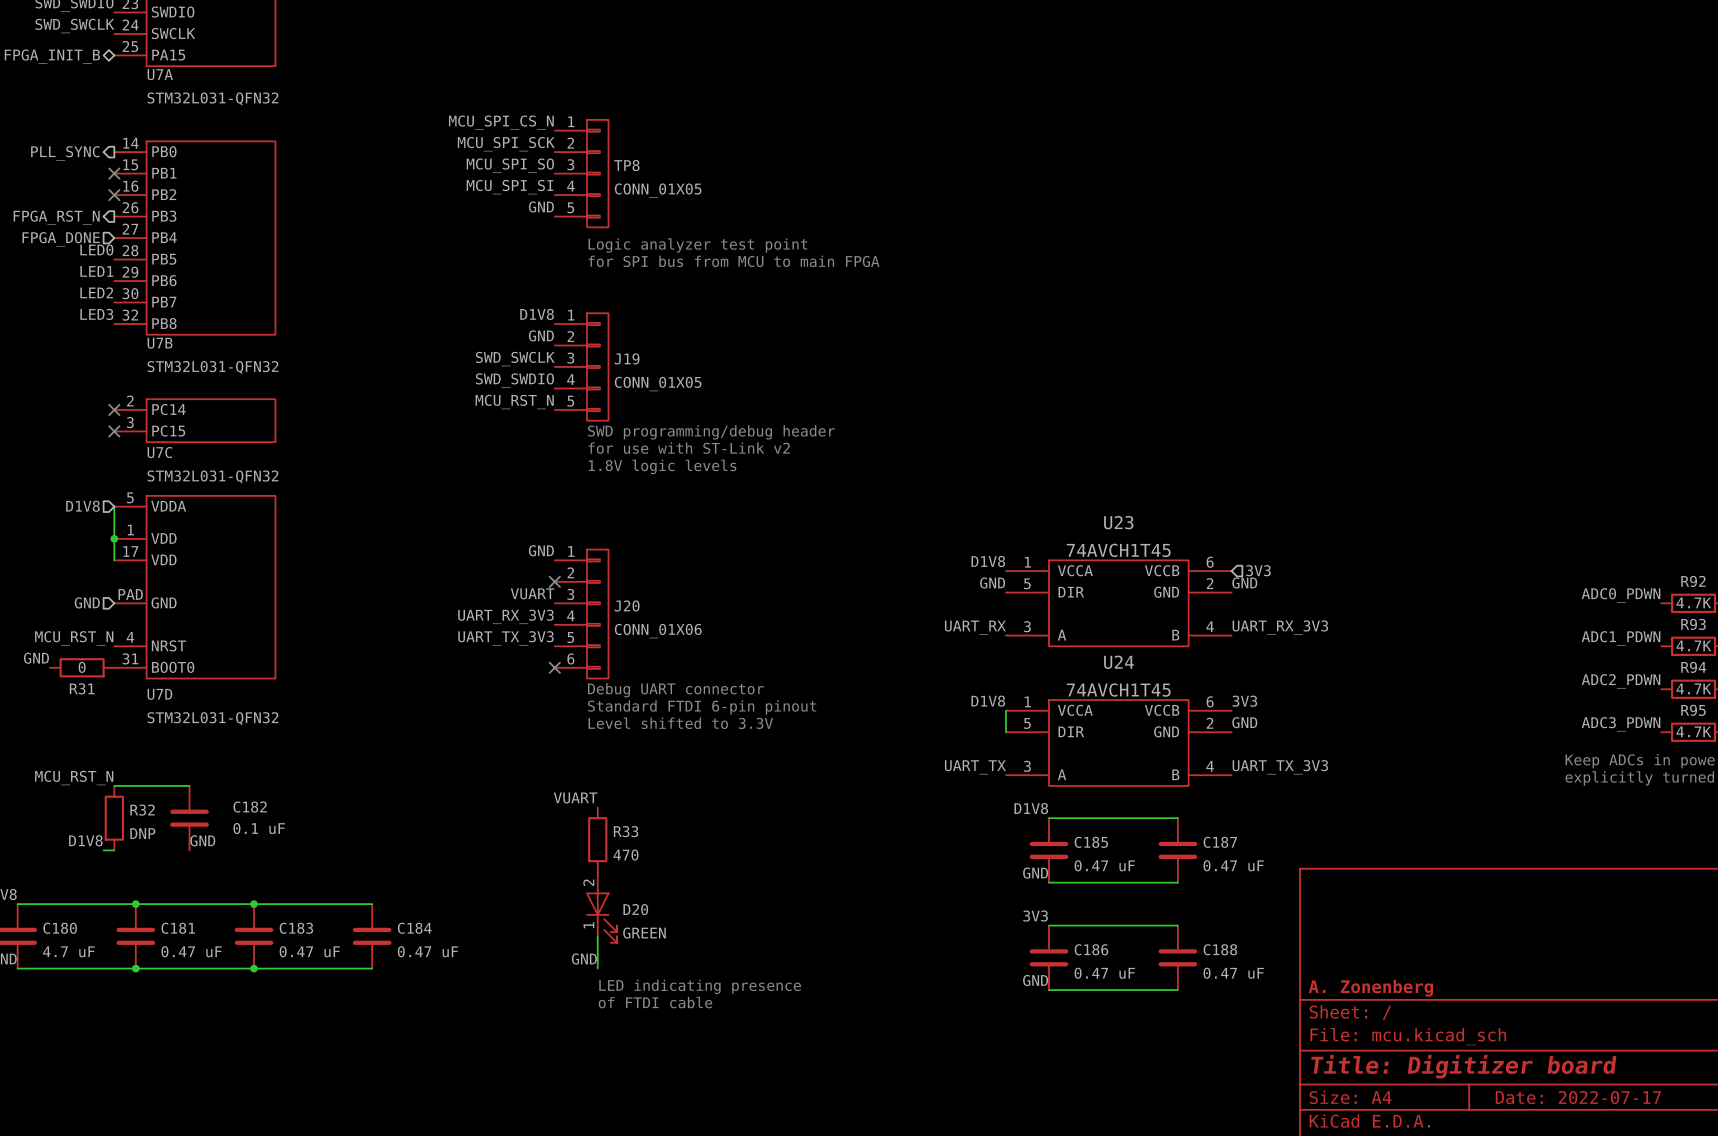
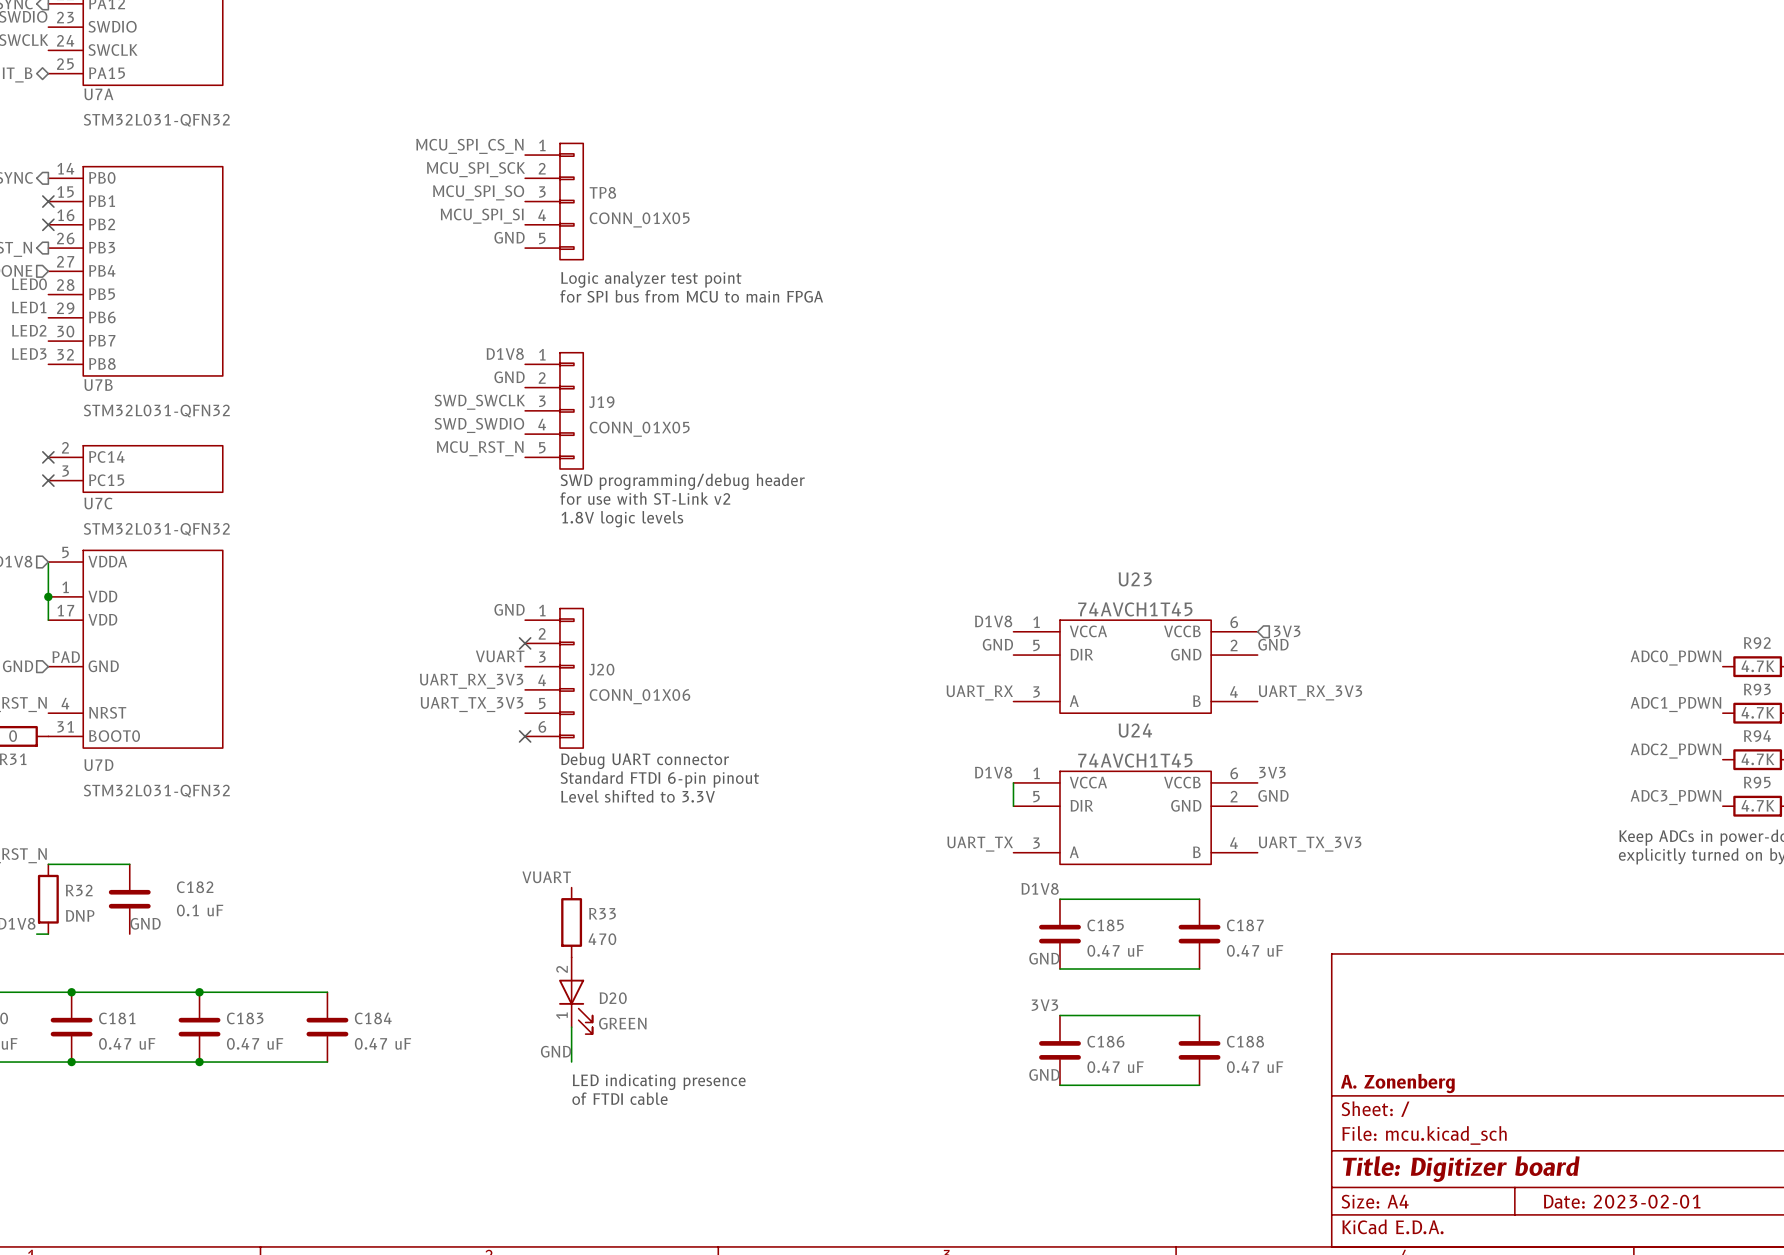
title block: Date: 2022-07-17 (1578, 1097) -> Date: 2023-02-01 (1622, 1201)

